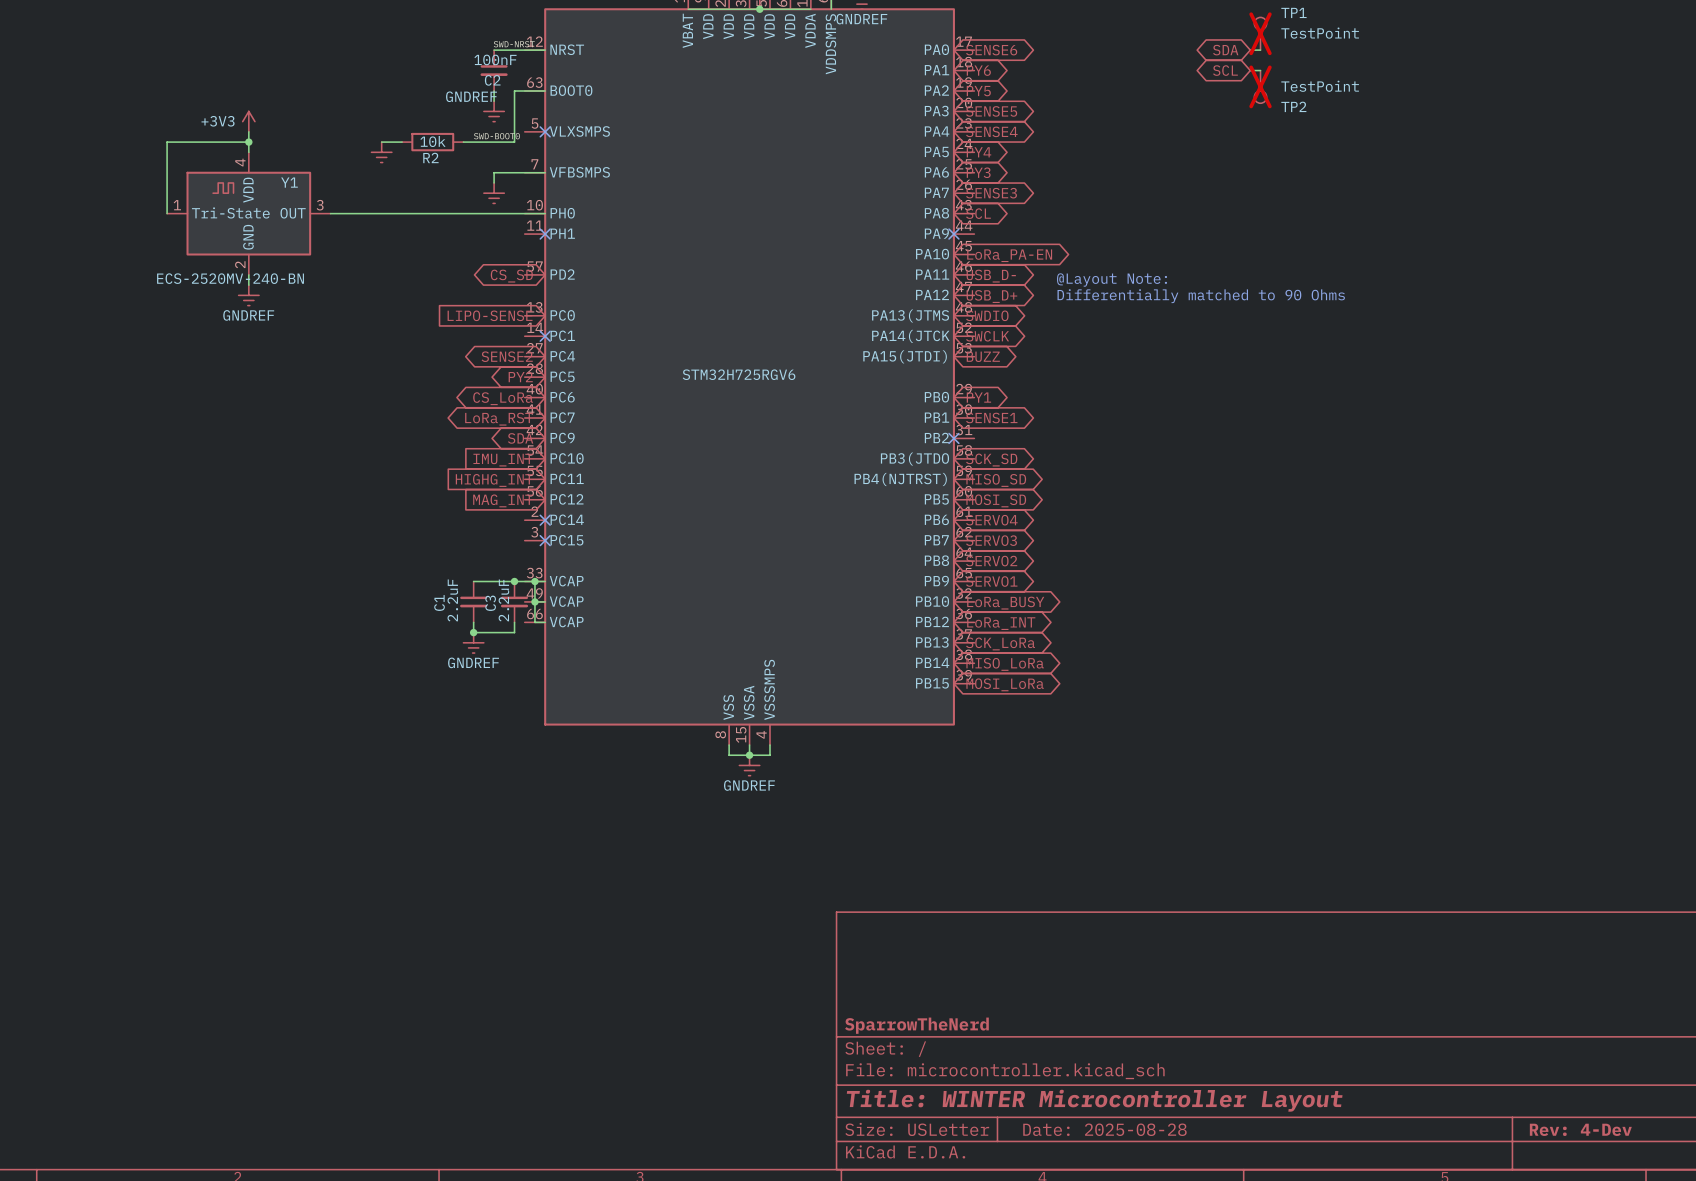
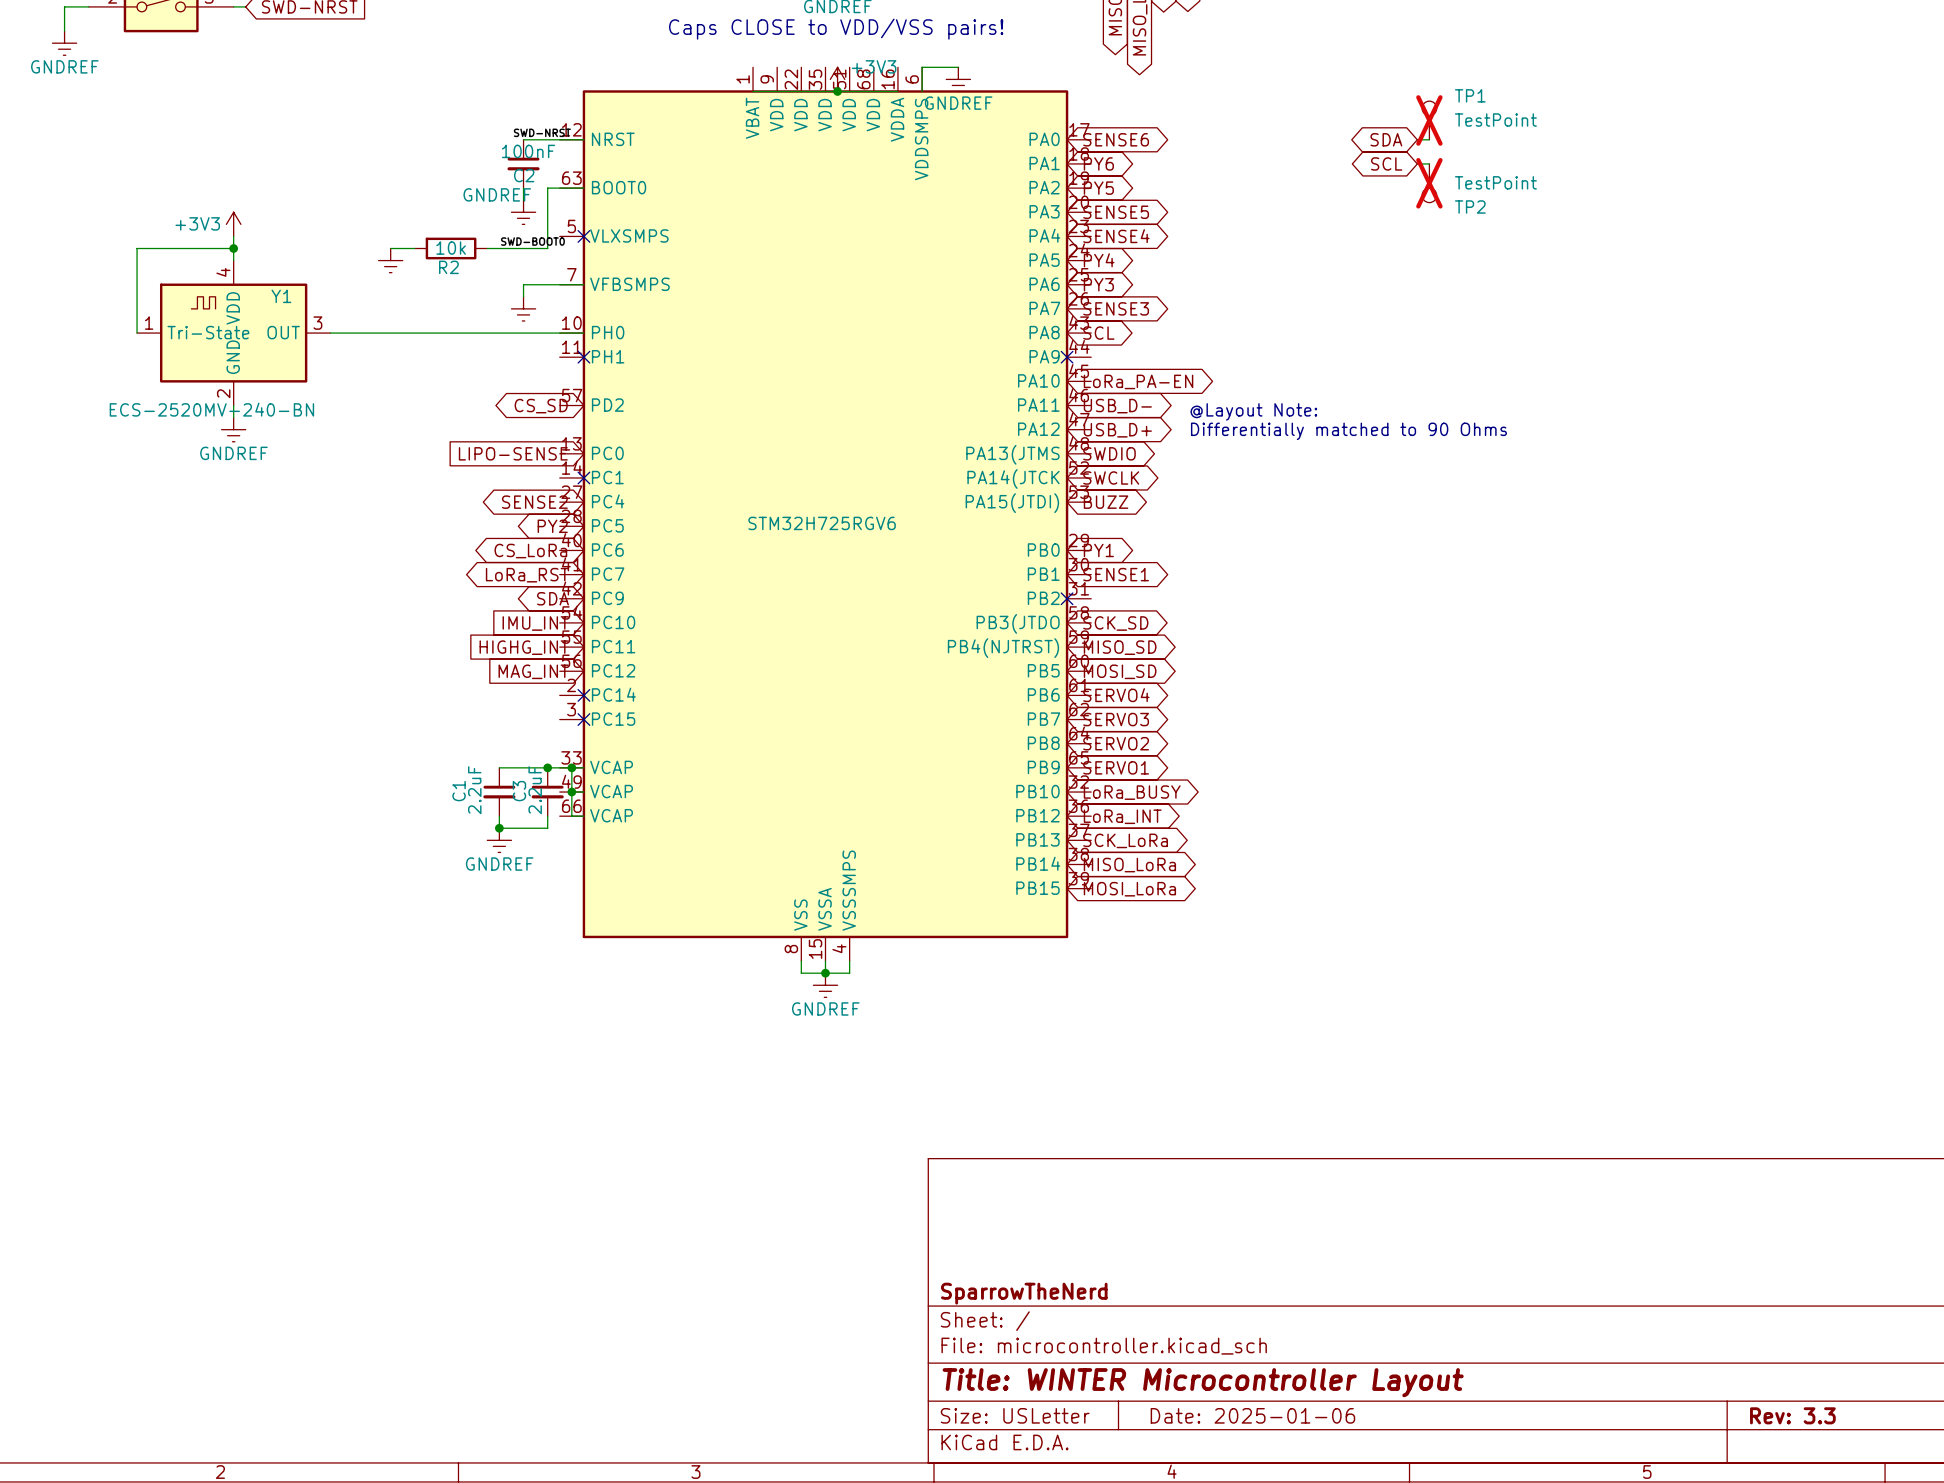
title block: Date: 2025-08-28 (1104, 1129) -> Date: 2025-01-06 (1252, 1415)
title block: Rev: 4-Dev (1580, 1129) -> Rev: 3.3 (1792, 1415)

